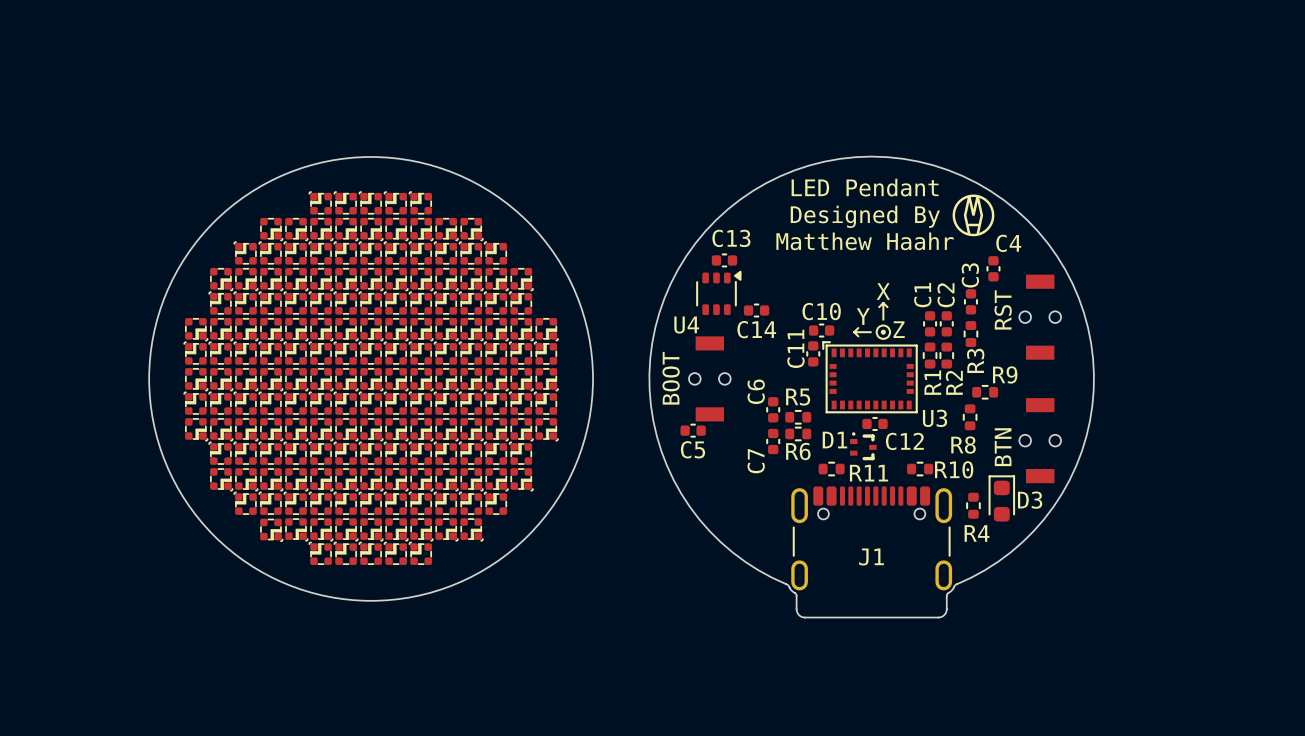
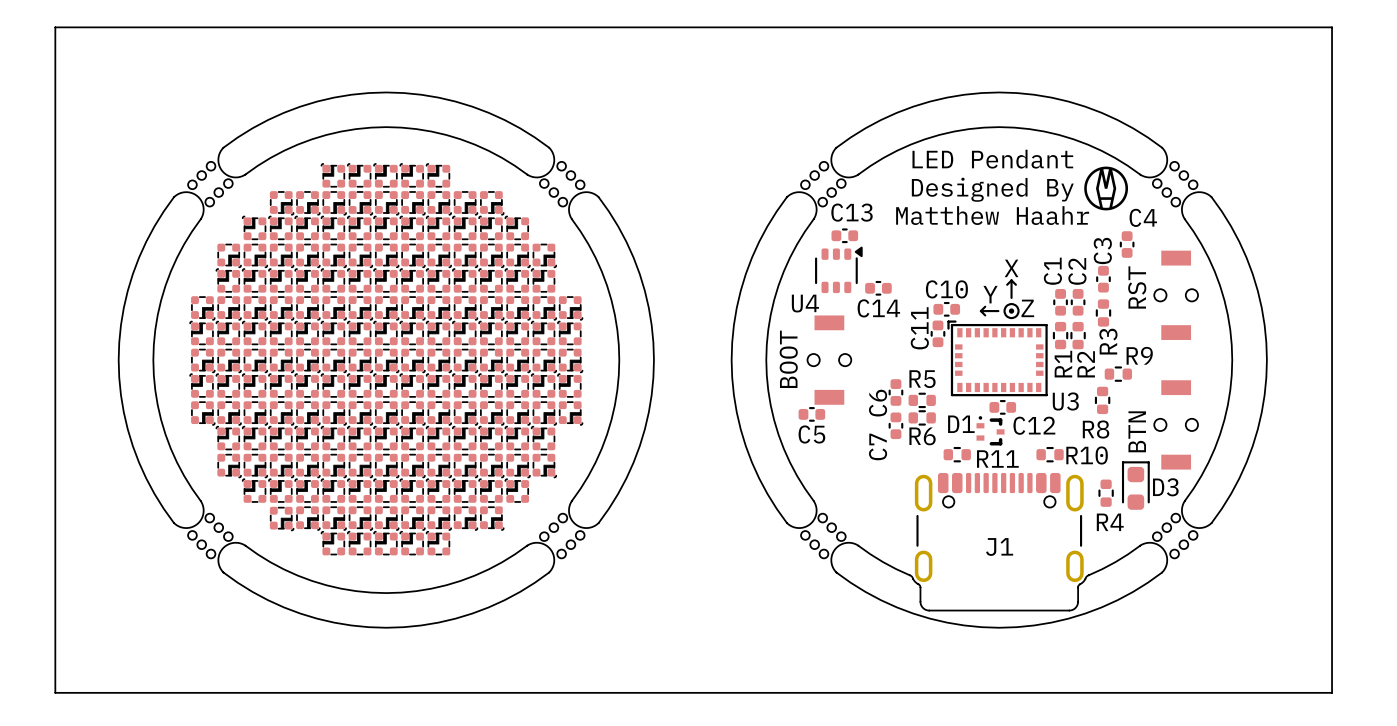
board edge: none -> (55, 27) (1332, 27) (1332, 692) (55, 692) (55, 27)
round board edge: [148, 156, 594, 602] -> none
board edge: none -> (223, 147) (268, 120) (300, 106) (351, 94) (386, 92) (438, 97) (472, 106) (504, 120) (549, 147)
board edge: none -> (836, 147) (880, 120) (913, 106) (947, 97) (999, 92) (1051, 97) (1085, 106) (1133, 128) (1162, 147)
text position: LED Pendant (865, 187) -> LED Pendant (992, 159)
board edge: none -> (245, 174) (283, 150) (311, 139) (341, 131) (386, 127) (431, 131) (460, 139) (502, 157) (527, 174)
board edge: none -> (858, 174) (883, 157) (924, 139) (969, 129) (999, 127) (1029, 129) (1073, 139) (1101, 150) (1140, 174)
part: none -> (209, 183)
part: none -> (562, 183)
part: none -> (822, 183)
part: none -> (1175, 183)
drawing position: (973, 215) -> (1106, 188)
text position: Designed By (865, 216) -> Designed By (992, 189)
board edge: none -> (173, 197) (146, 241) (132, 274) (120, 325) (118, 360) (120, 395) (132, 446) (154, 493) (173, 522)
board edge: none -> (598, 197) (618, 226) (639, 274) (651, 325) (653, 360) (648, 412) (639, 446) (626, 478) (598, 522)
board edge: none -> (786, 197) (767, 226) (745, 274) (733, 325) (731, 360) (736, 412) (745, 446) (759, 478) (786, 522)
board edge: none -> (1211, 197) (1231, 226) (1252, 274) (1264, 325) (1266, 360) (1261, 412) (1252, 446) (1231, 493) (1211, 522)
text position: Matthew Haahr (865, 241) -> Matthew Haahr (992, 215)
board edge: none -> (200, 219) (177, 257) (165, 285) (155, 329) (153, 360) (155, 390) (165, 434) (177, 462) (200, 501)
board edge: none -> (571, 219) (595, 257) (607, 285) (617, 329) (619, 360) (614, 405) (607, 434) (595, 462) (571, 501)
board edge: none -> (813, 219) (789, 257) (778, 285) (770, 314) (766, 360) (768, 390) (778, 434) (797, 475) (813, 501)
board edge: none -> (1184, 219) (1201, 244) (1220, 285) (1227, 314) (1232, 360) (1227, 405) (1220, 434) (1201, 475) (1184, 501)
C13 position: (724, 260) -> (844, 235)
C4 position: (993, 268) -> (1127, 244)
U4 position: (718, 292) -> (838, 269)
C3 position: (970, 301) -> (1103, 279)
C14 position: (756, 310) -> (878, 288)
part position: (1040, 317) -> (1176, 295)
C1 position: (930, 323) -> (1060, 302)
C2 position: (946, 323) -> (1078, 302)
C10 position: (821, 330) -> (946, 309)
R3 position: (970, 334) -> (1103, 313)
C11 position: (813, 353) -> (937, 333)
R1 position: (930, 355) -> (1060, 335)
R2 position: (946, 355) -> (1078, 335)
U3 position: (870, 357) -> (997, 337)
part position: (709, 378) -> (829, 360)
C6 name position: C6 (756, 391) -> C6 (878, 403)
R9 position: (985, 392) -> (1118, 374)
C6 position: (773, 409) -> (895, 392)
R5 position: (798, 417) -> (922, 400)
R8 position: (970, 417) -> (1102, 400)
C12 position: (875, 423) -> (1002, 407)
C5 position: (693, 430) -> (811, 414)
R6 position: (798, 433) -> (922, 417)
part position: (1040, 440) -> (1176, 424)
C7 position: (773, 441) -> (895, 425)
D1 position: (863, 446) -> (990, 430)
R11 position: (831, 469) -> (957, 454)
R10 position: (920, 469) -> (1050, 454)
D3 position: (1001, 498) -> (1135, 485)
R4 position: (973, 505) -> (1106, 493)
J1 position: (871, 538) -> (999, 527)
part: none -> (209, 536)
part: none -> (562, 536)
part: none -> (822, 536)
part: none -> (1175, 536)
board edge: none -> (245, 545) (283, 569) (311, 580) (341, 588) (386, 593) (431, 588) (460, 580) (488, 569) (527, 545)
board edge: none -> (1140, 545) (1115, 562) (1087, 576) (1078, 585) (1077, 604) (1072, 609) (981, 610)
board edge: none -> (223, 572) (268, 600) (300, 613) (334, 622) (386, 627) (438, 622) (472, 613) (520, 591) (549, 572)
board edge: none -> (836, 572) (880, 600) (913, 613) (964, 625) (999, 627) (1051, 622) (1085, 613) (1133, 591) (1162, 572)
board edge: (888, 617) (801, 616) (796, 611) (796, 594) (787, 585) (758, 570) (720, 542) (689, 506) (667, 465) (656, 436) (649, 389) (652, 343) (659, 312) (678, 269) (705, 231) (739, 199) (780, 176) (809, 165) (856, 157) (887, 157) (933, 165) (976, 183) (1015, 209) (1048, 243) (1065, 269) (1078, 297) (1091, 343) (1093, 374) (1089, 421) (1081, 451) (1069, 480) (1053, 506) (1022, 542) (998, 561) (954, 585) (946, 594) (945, 613) (938, 617) -> (929, 610) (921, 606) (920, 586) (911, 576) (883, 562) (858, 545)

